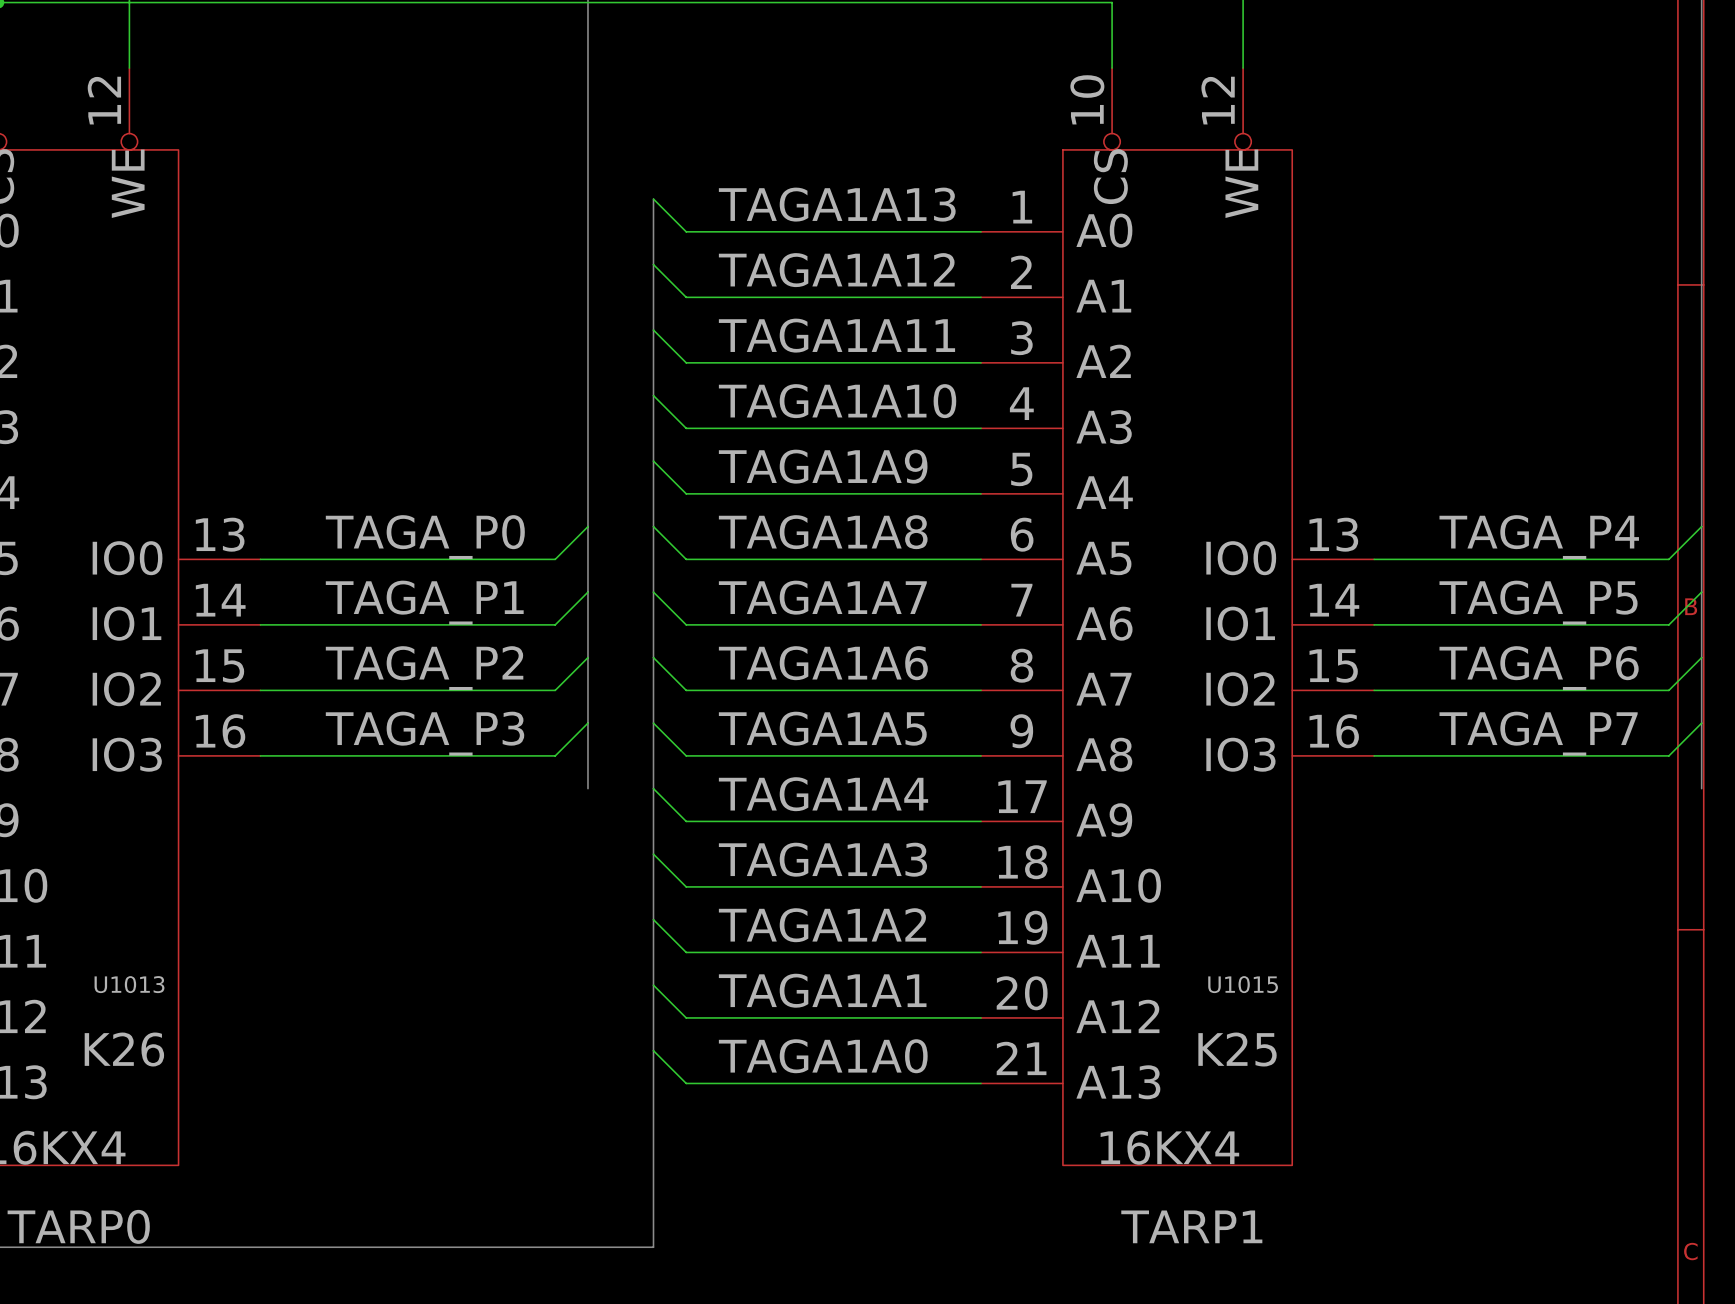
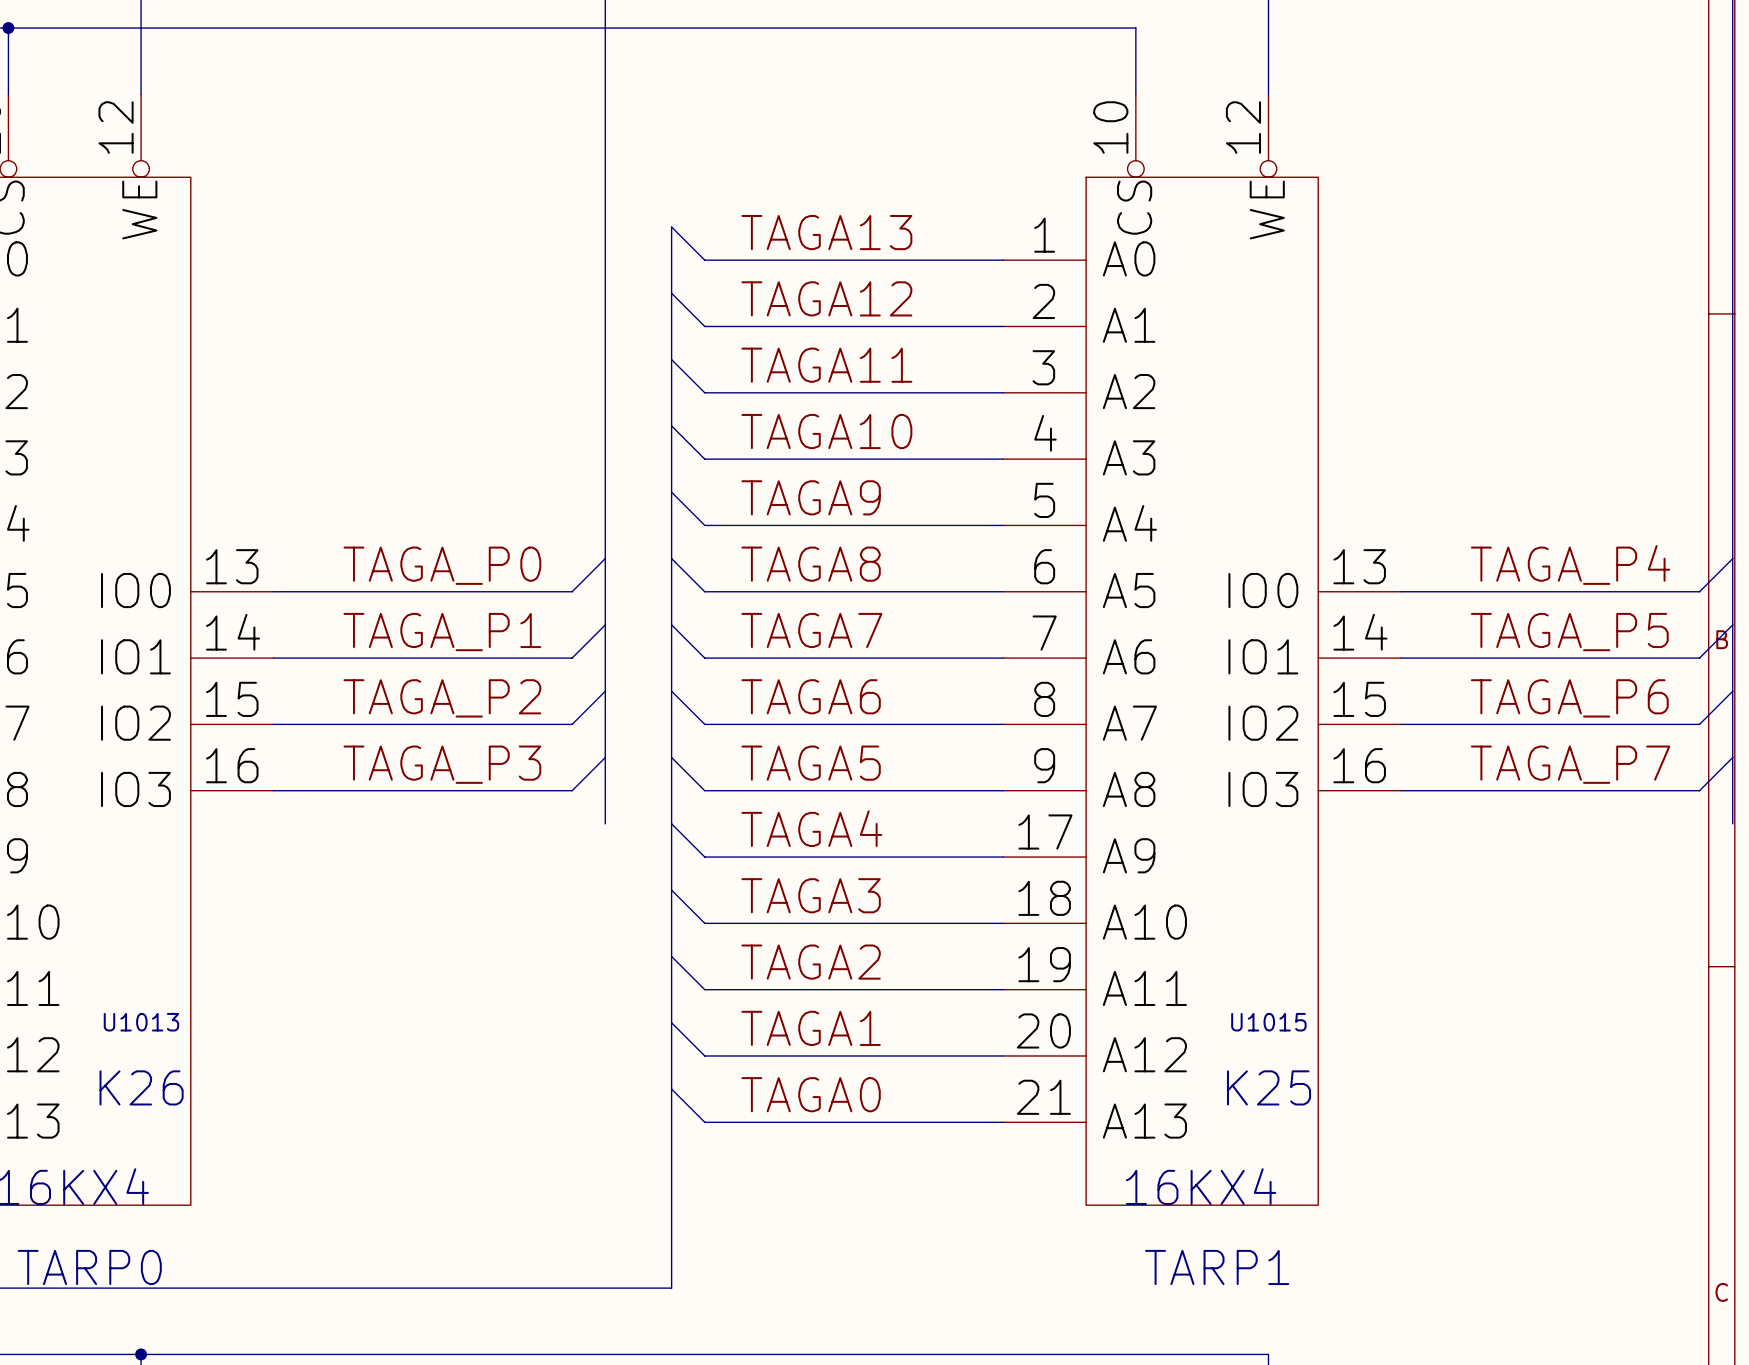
label: TAGA1A13 (837, 204) -> TAGA13 (826, 232)
label: TAGA1A12 (836, 270) -> TAGA12 (826, 298)
label: TAGA1A11 (836, 335) -> TAGA11 (826, 365)
label: TAGA1A10 (837, 401) -> TAGA10 (826, 431)
label: TAGA1A9 (823, 466) -> TAGA9 (811, 497)
label: TAGA1A8 (823, 532) -> TAGA8 (811, 564)
label: TAGA1A7 (822, 597) -> TAGA7 (811, 630)
label: TAGA1A6 (823, 663) -> TAGA6 (811, 696)
label: TAGA1A5 (822, 728) -> TAGA5 (811, 763)
label: TAGA1A4 (823, 794) -> TAGA4 (811, 828)
label: TAGA1A3 (822, 859) -> TAGA3 (811, 895)
label: TAGA1A2 (822, 925) -> TAGA2 (811, 962)
label: TAGA1A1 (822, 990) -> TAGA1 (811, 1028)
label: TAGA1A0 (823, 1056) -> TAGA0 (811, 1094)

